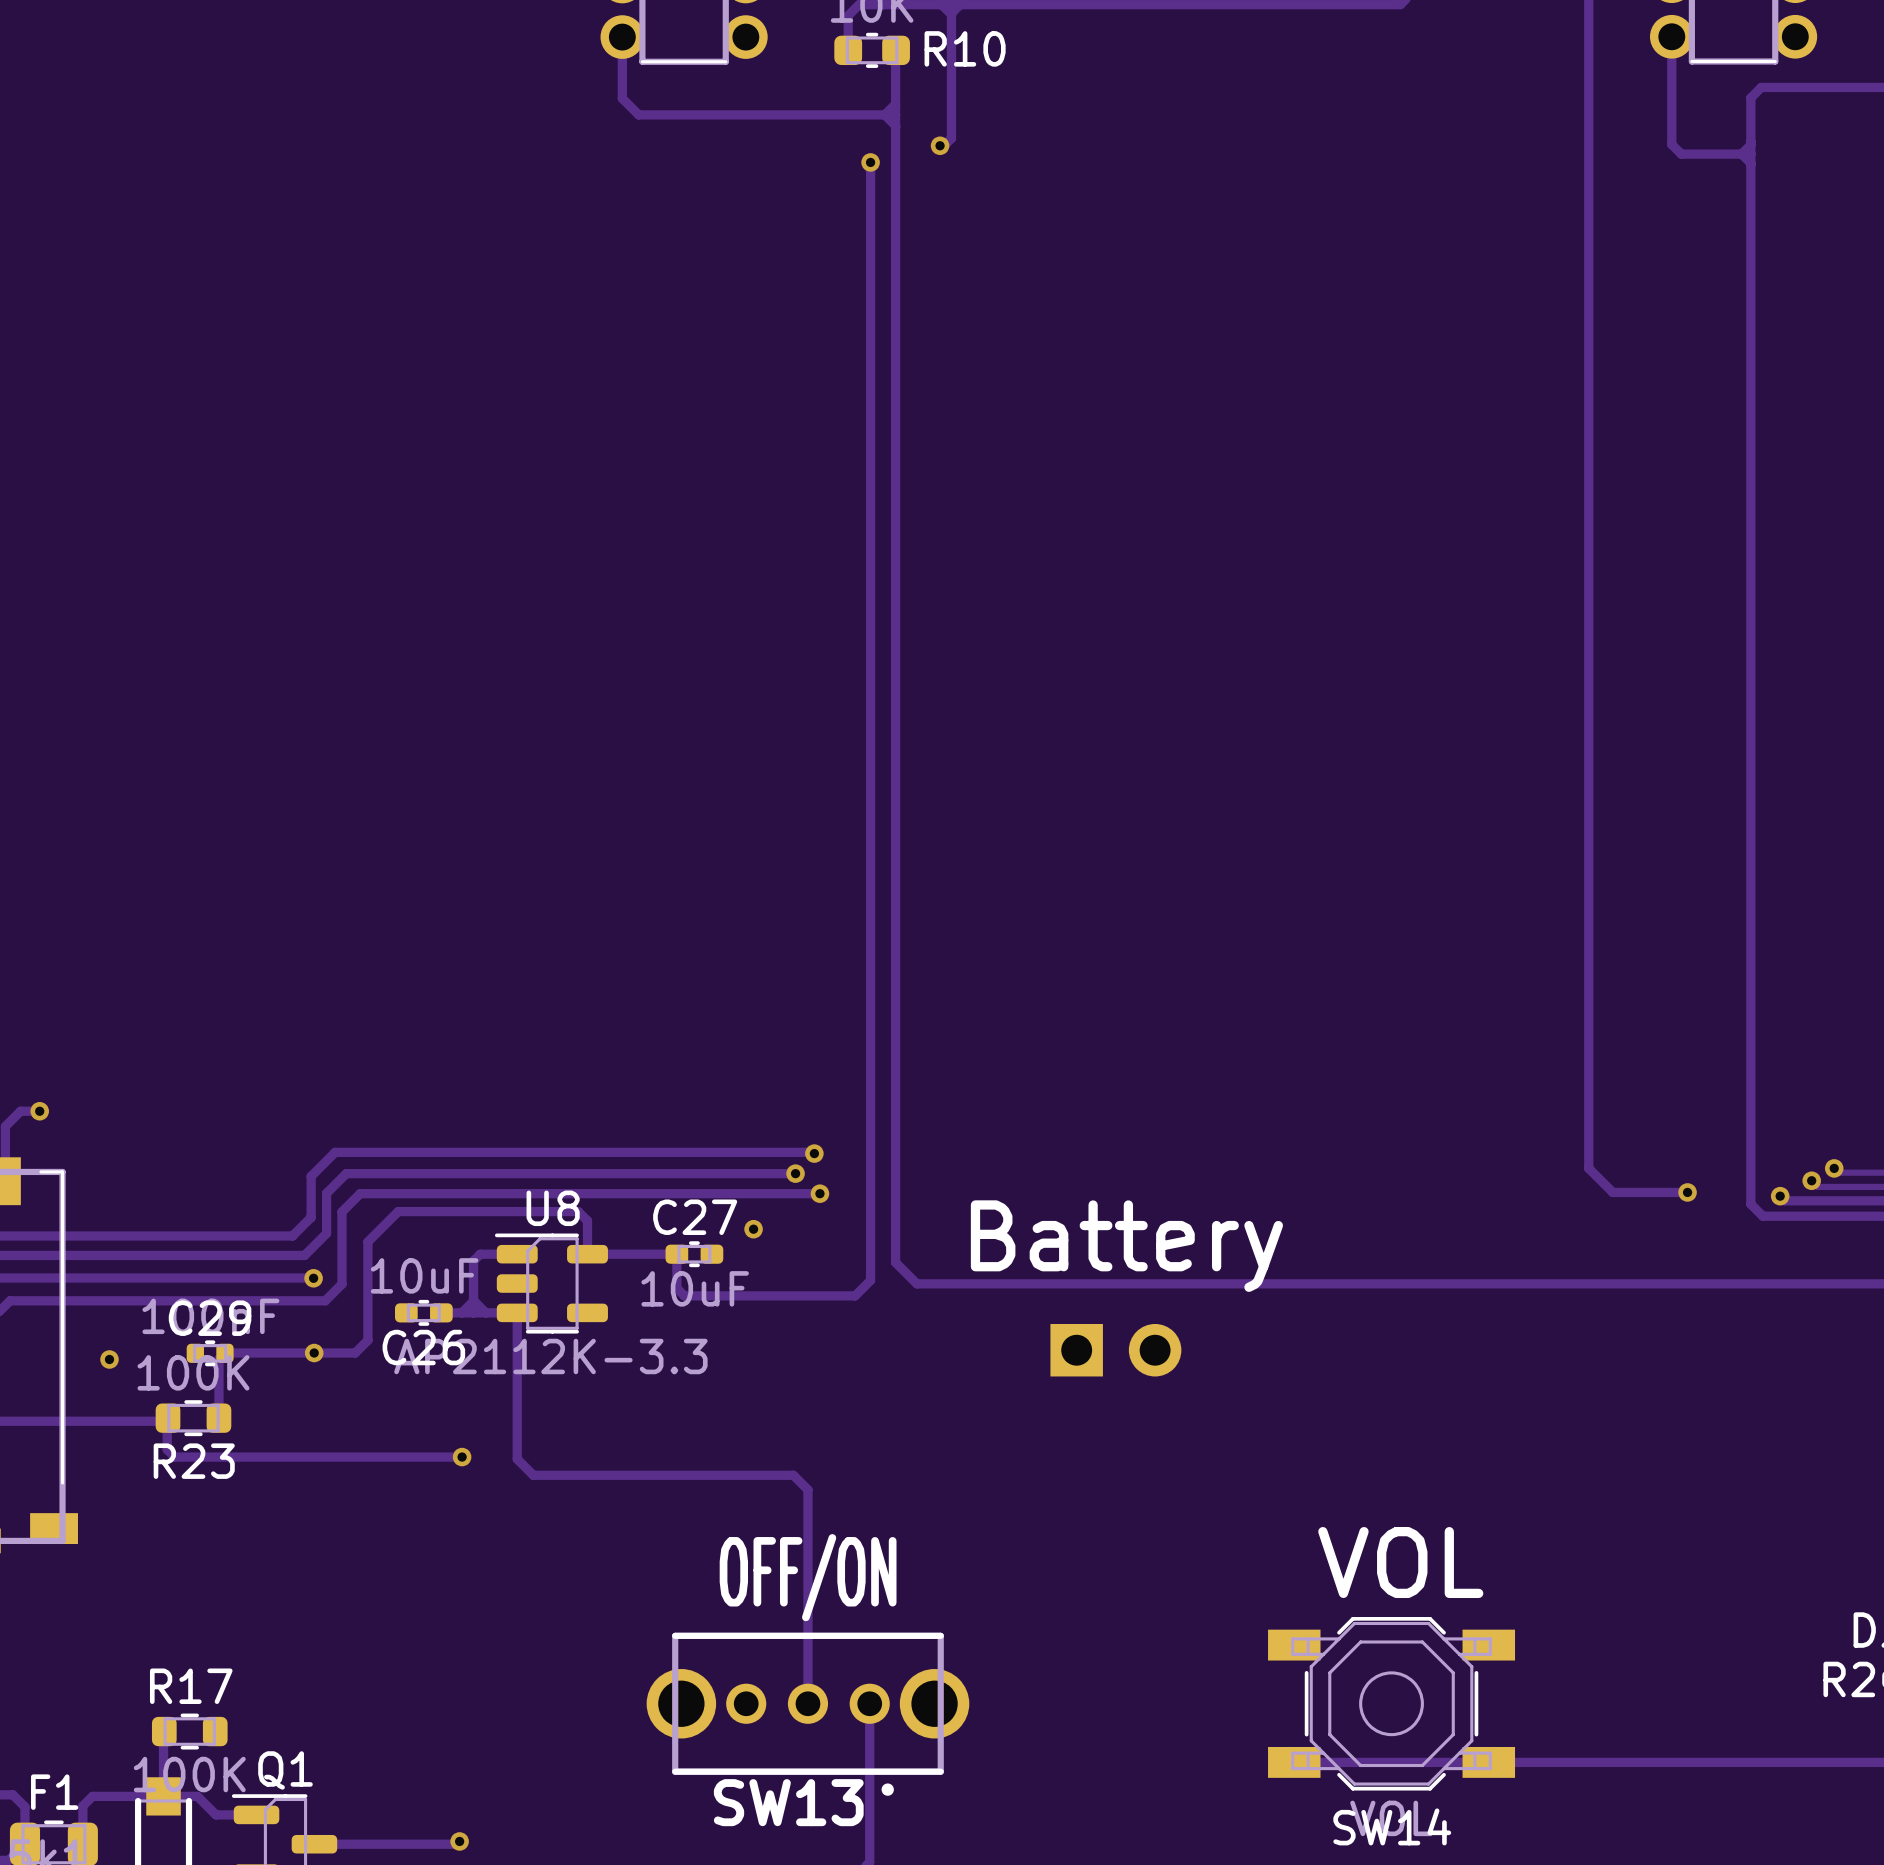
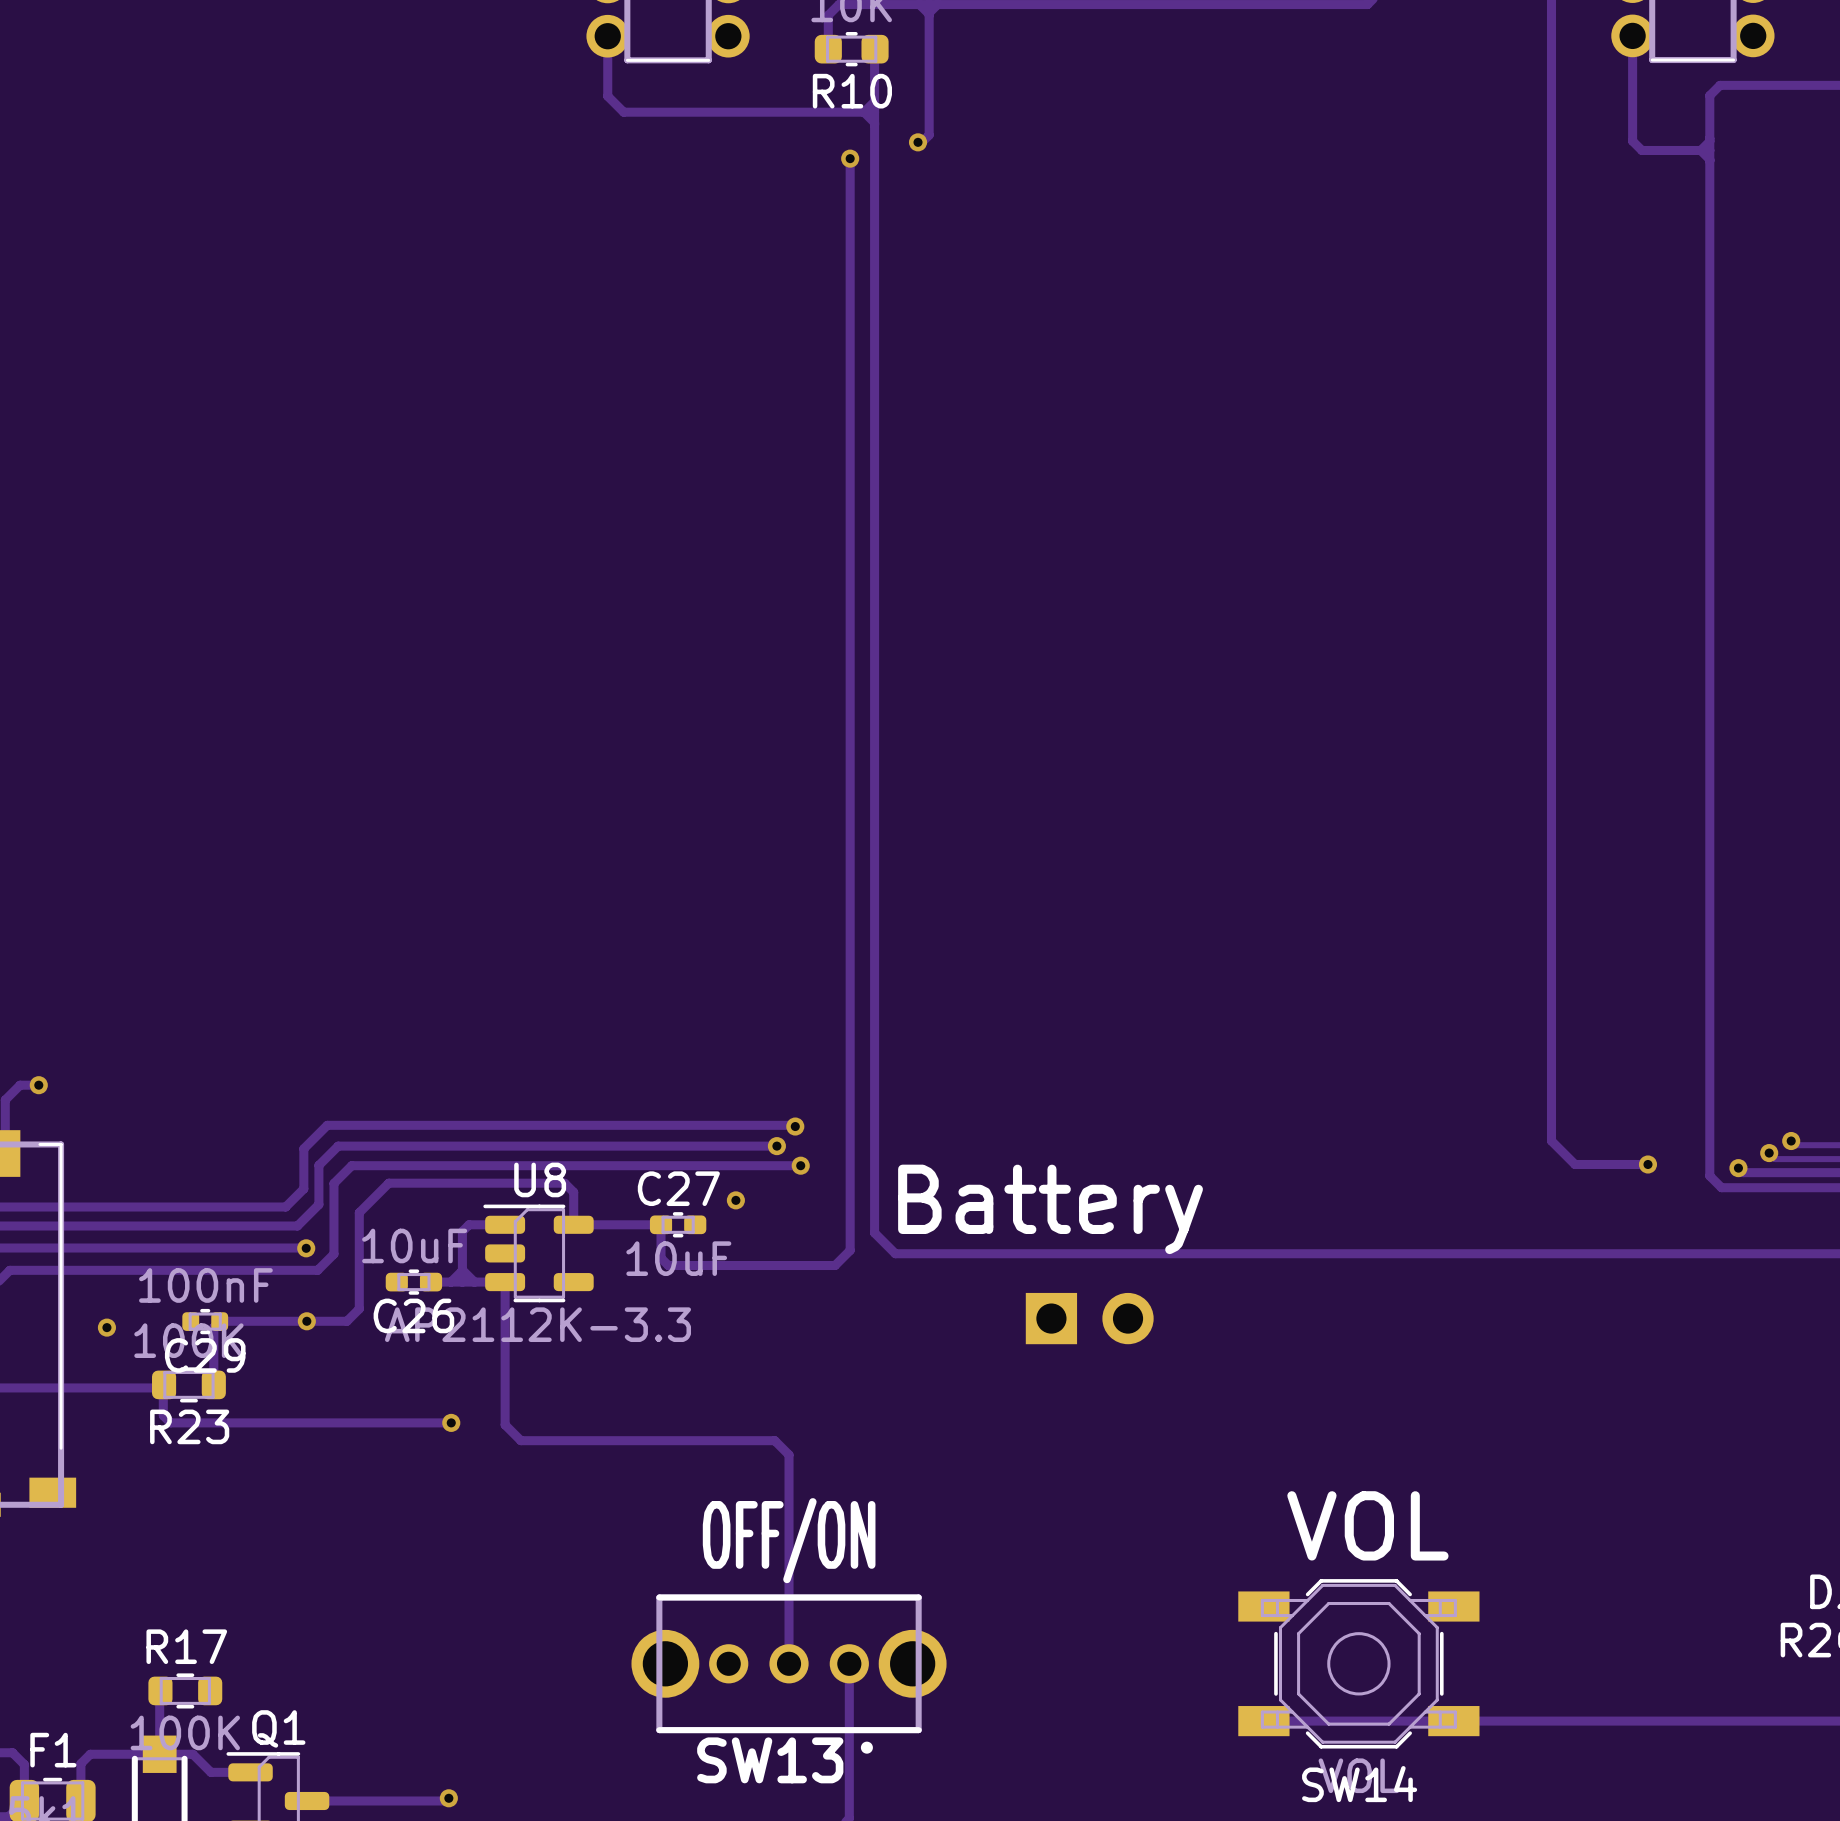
R10 name position: R10 (965, 48) -> R10 (852, 91)
text position: Battery (1126, 1246) -> Battery (1050, 1209)
C29 name position: C29 (210, 1318) -> C29 (205, 1355)

